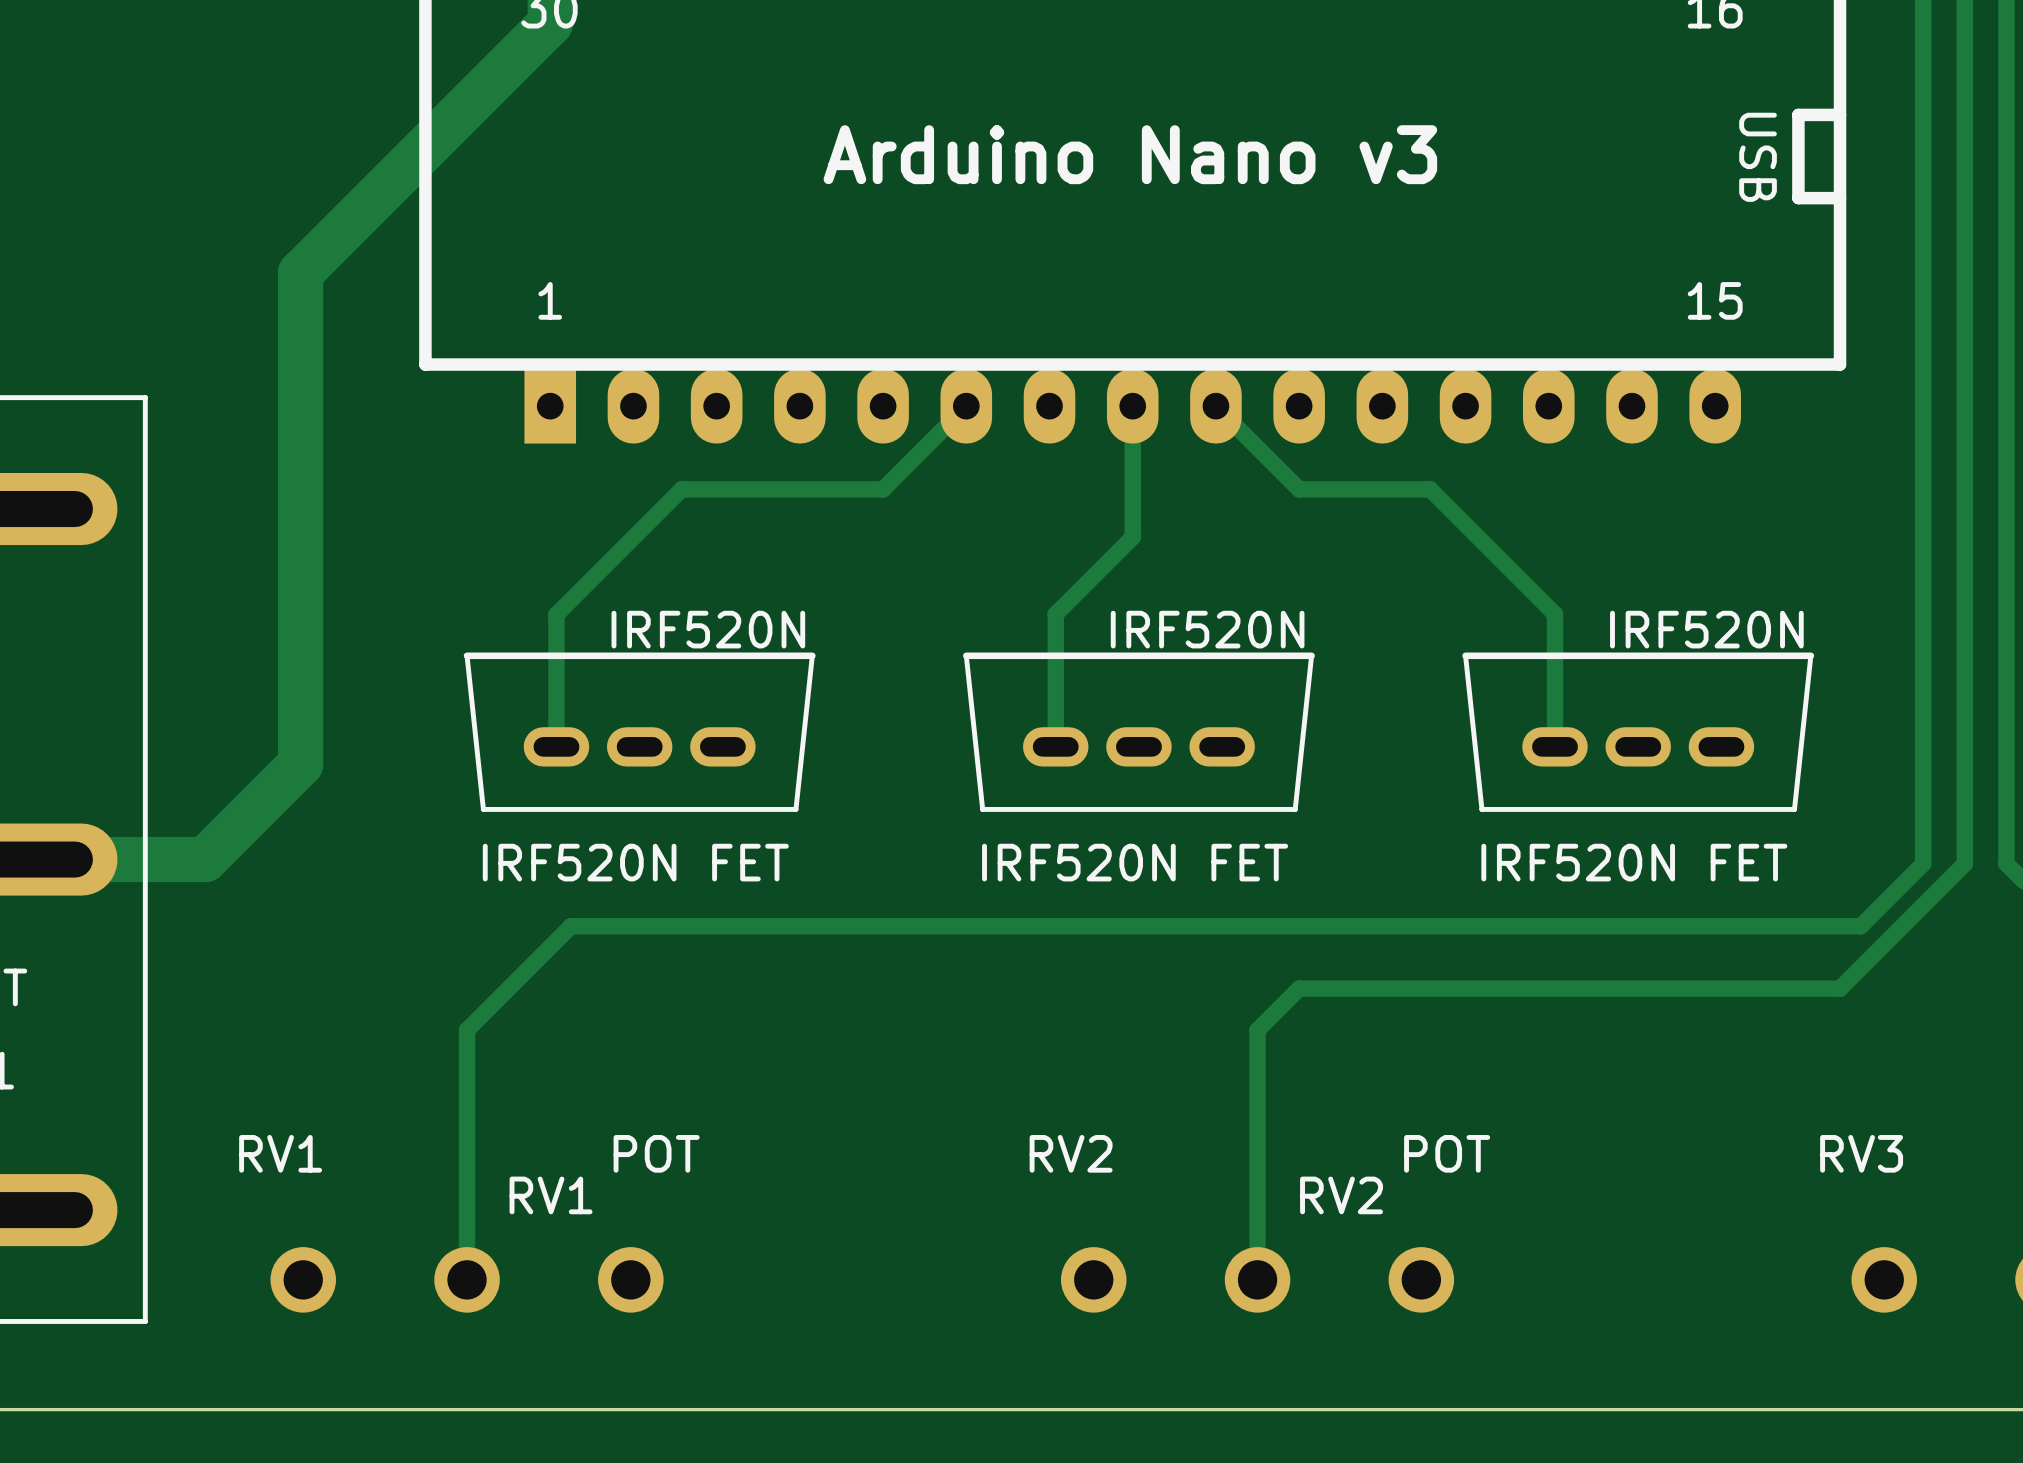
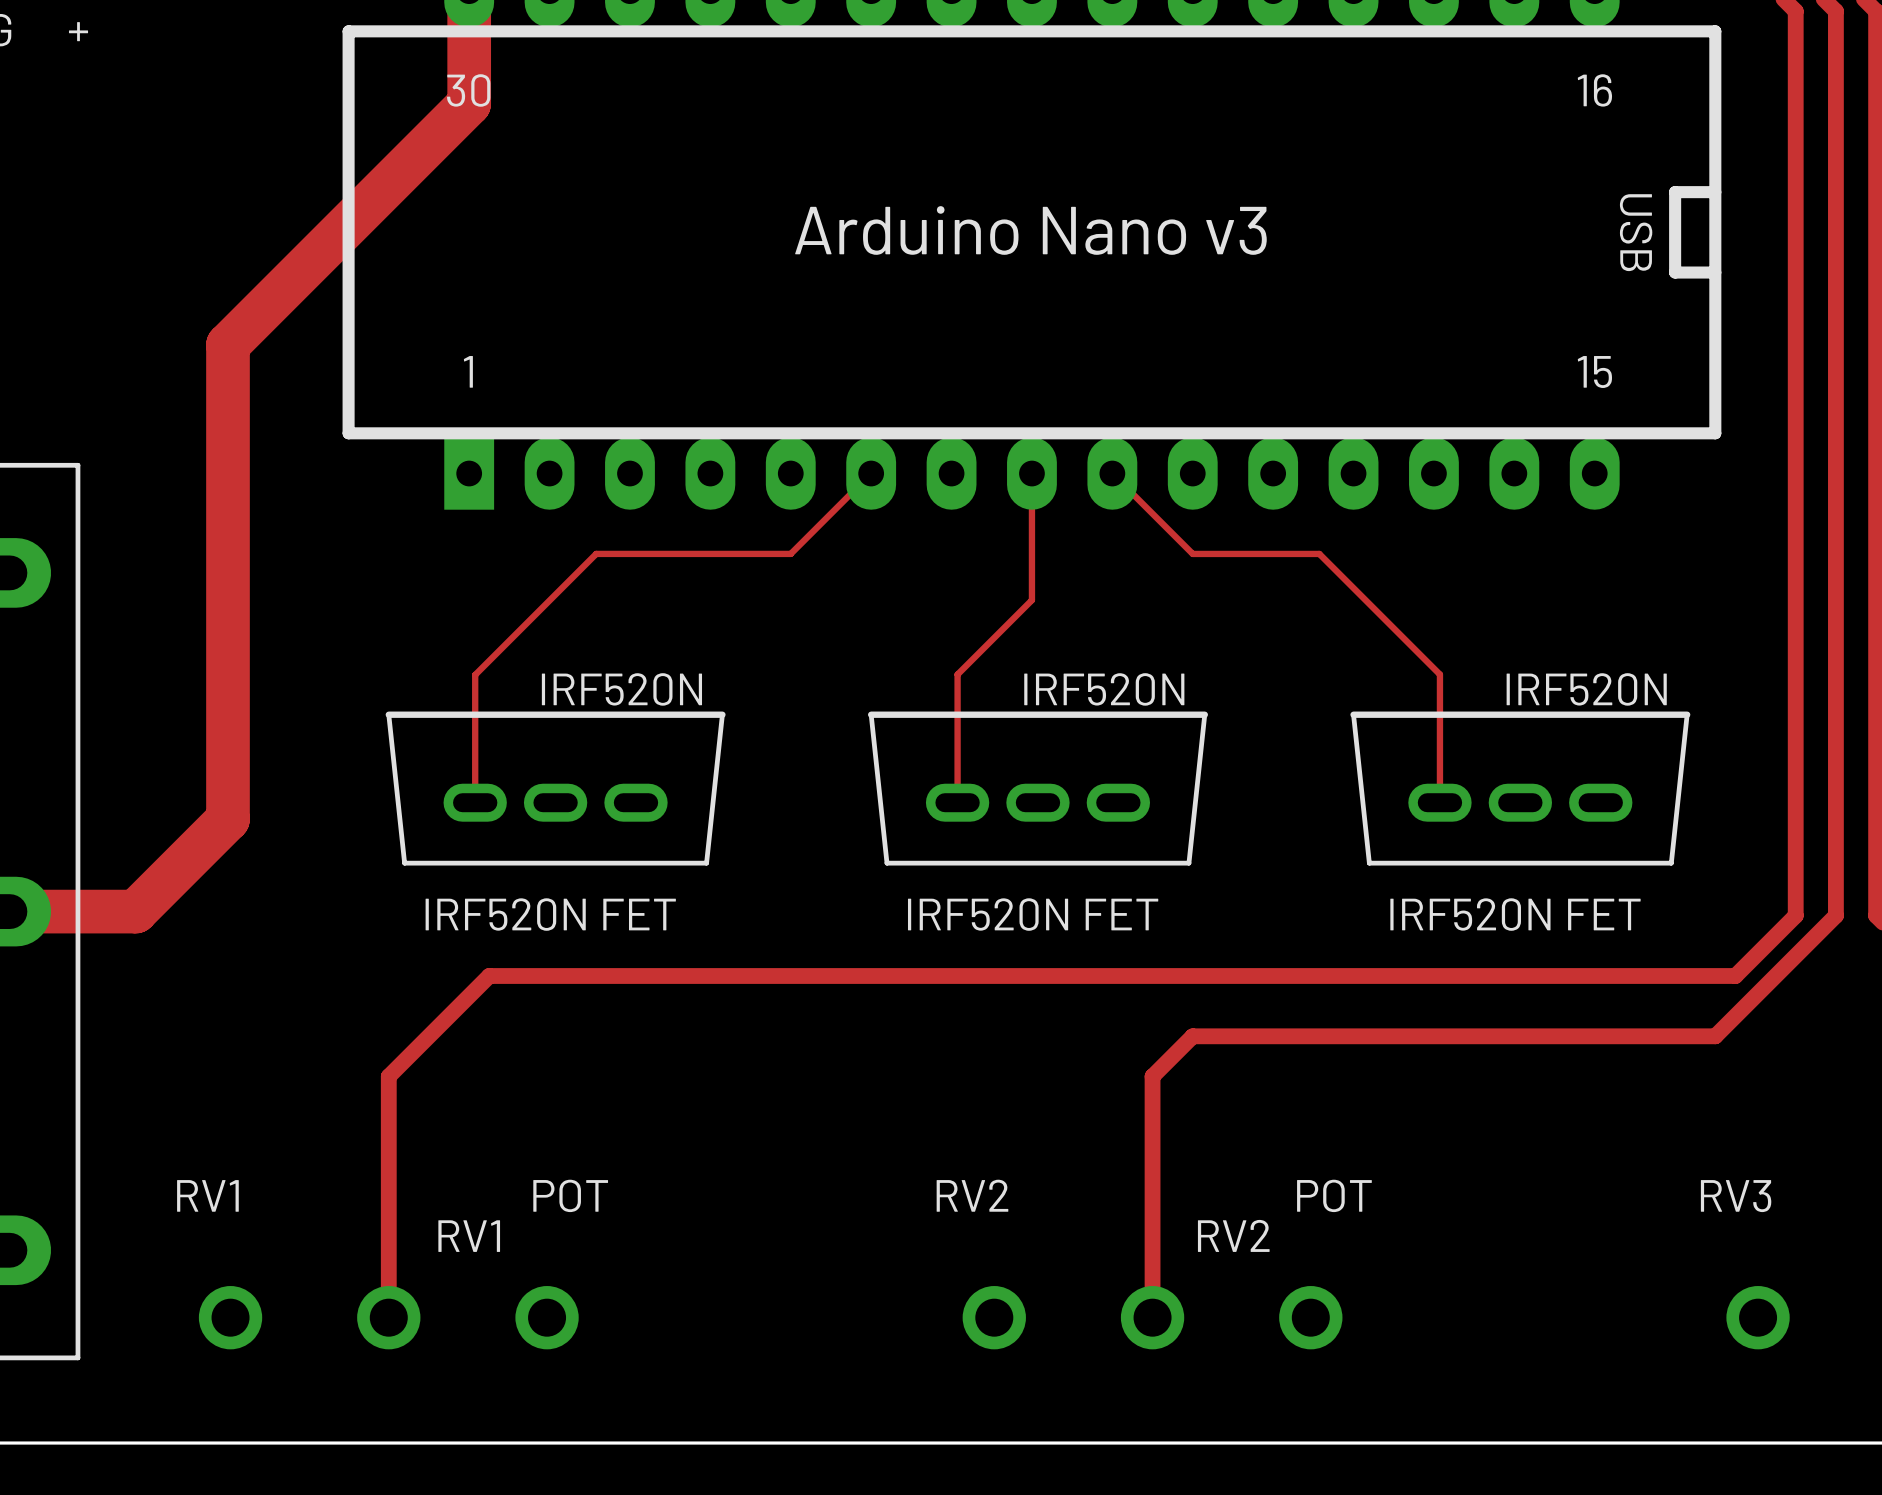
track width: thick (966, 406) (883, 489) (681, 489) (556, 614) (556, 746) -> thin (871, 473) (790, 553) (596, 553) (475, 674) (475, 802)
track width: thick (1132, 406) (1132, 537) (1055, 614) (1055, 746) -> thin (1031, 473) (1031, 600) (957, 674) (957, 802)
track width: thick (1215, 406) (1299, 489) (1430, 489) (1555, 614) (1555, 746) -> thin (1112, 473) (1192, 553) (1319, 553) (1439, 674) (1439, 802)

